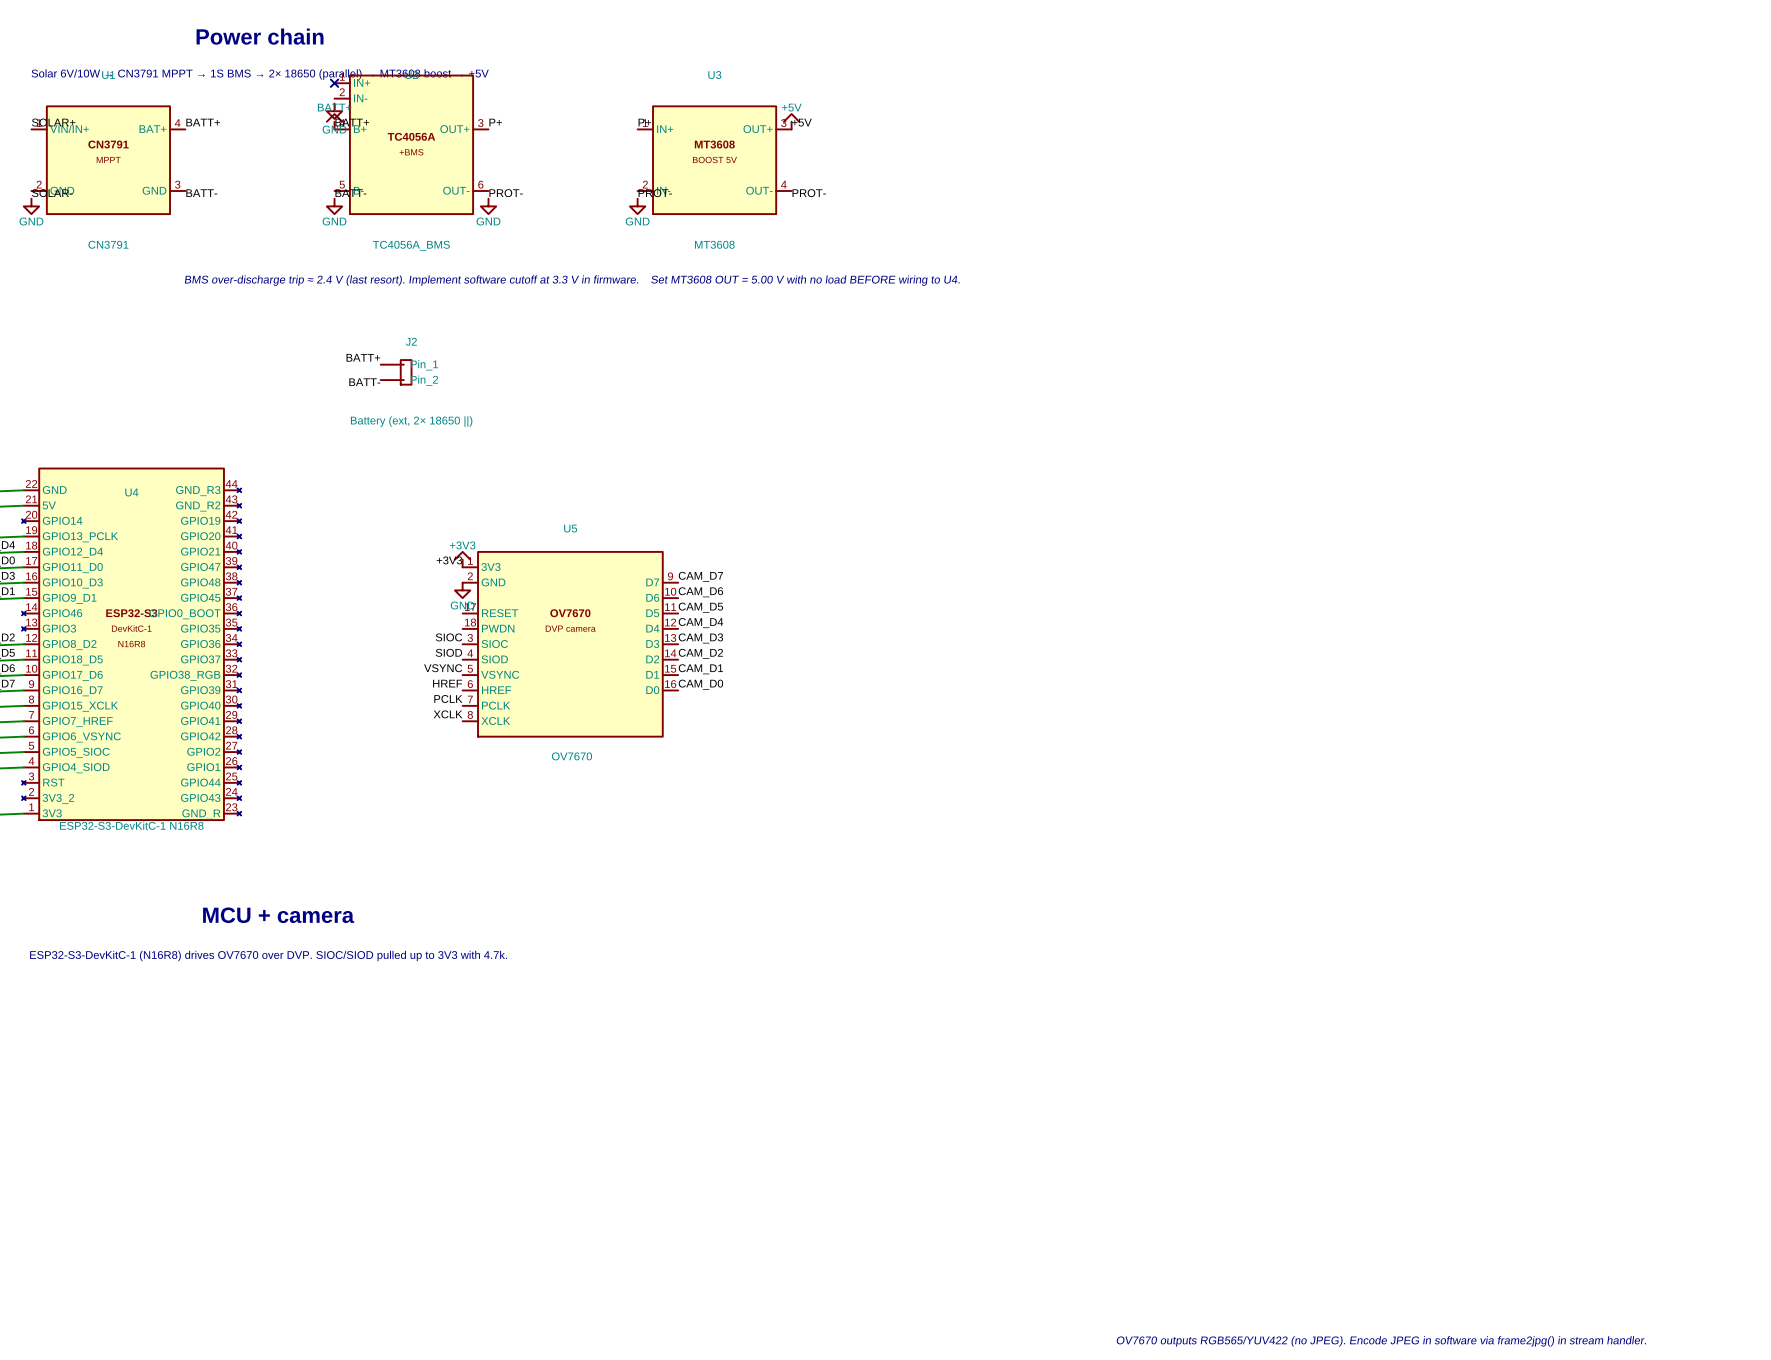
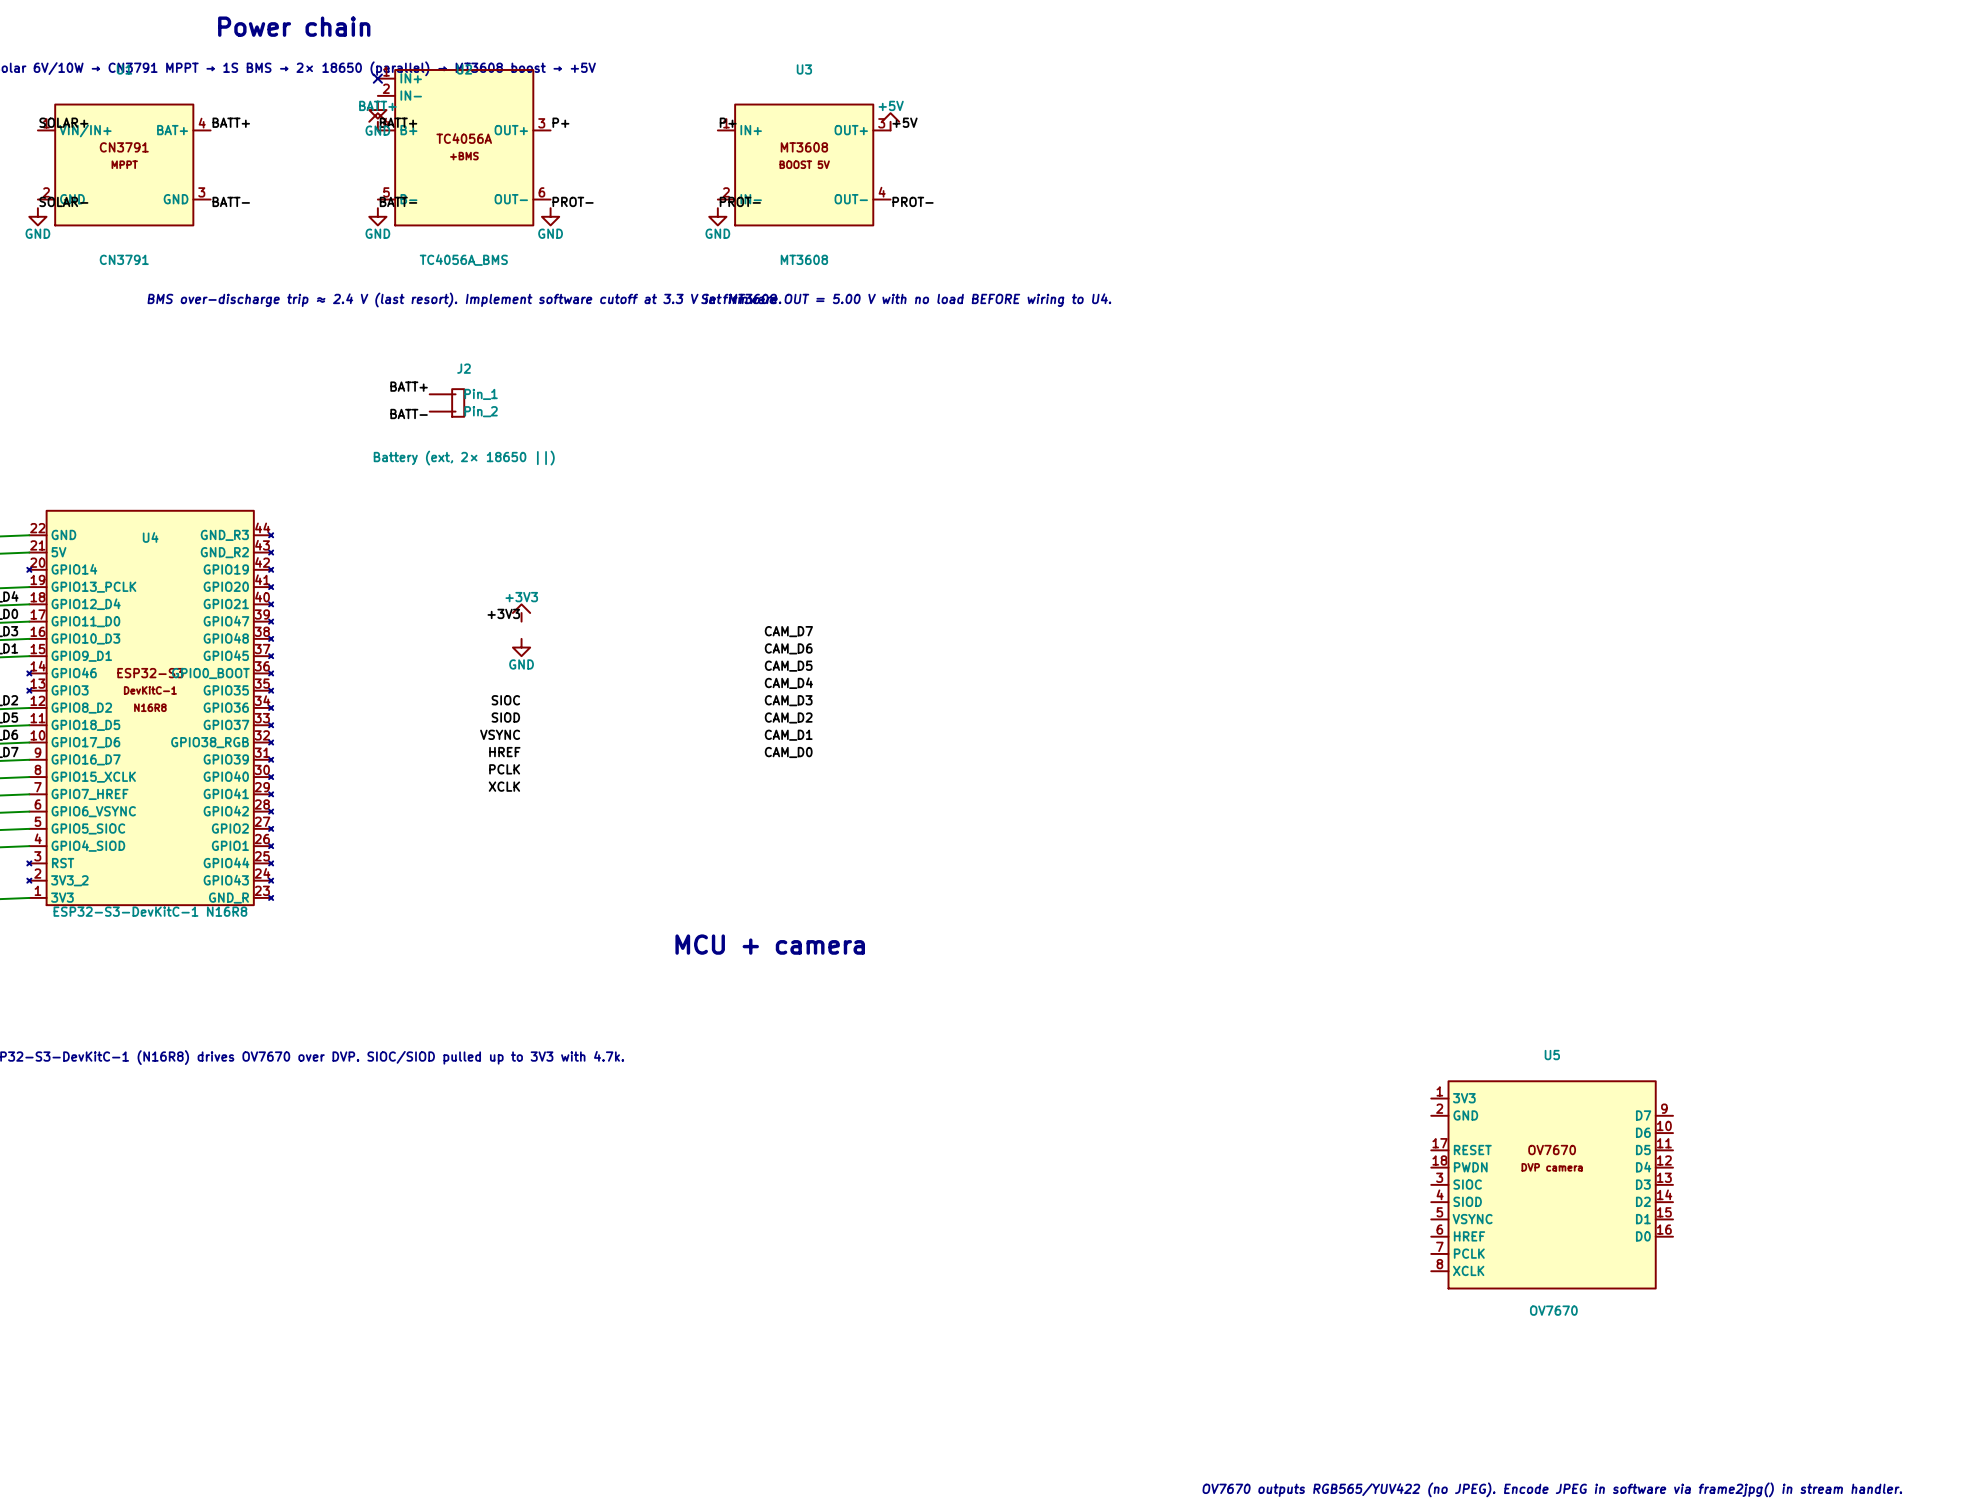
U5 position: (570, 644) -> (1552, 1184)
text: none -> MCU + camera (770, 944)
text: MCU + camera (278, 915) -> none

